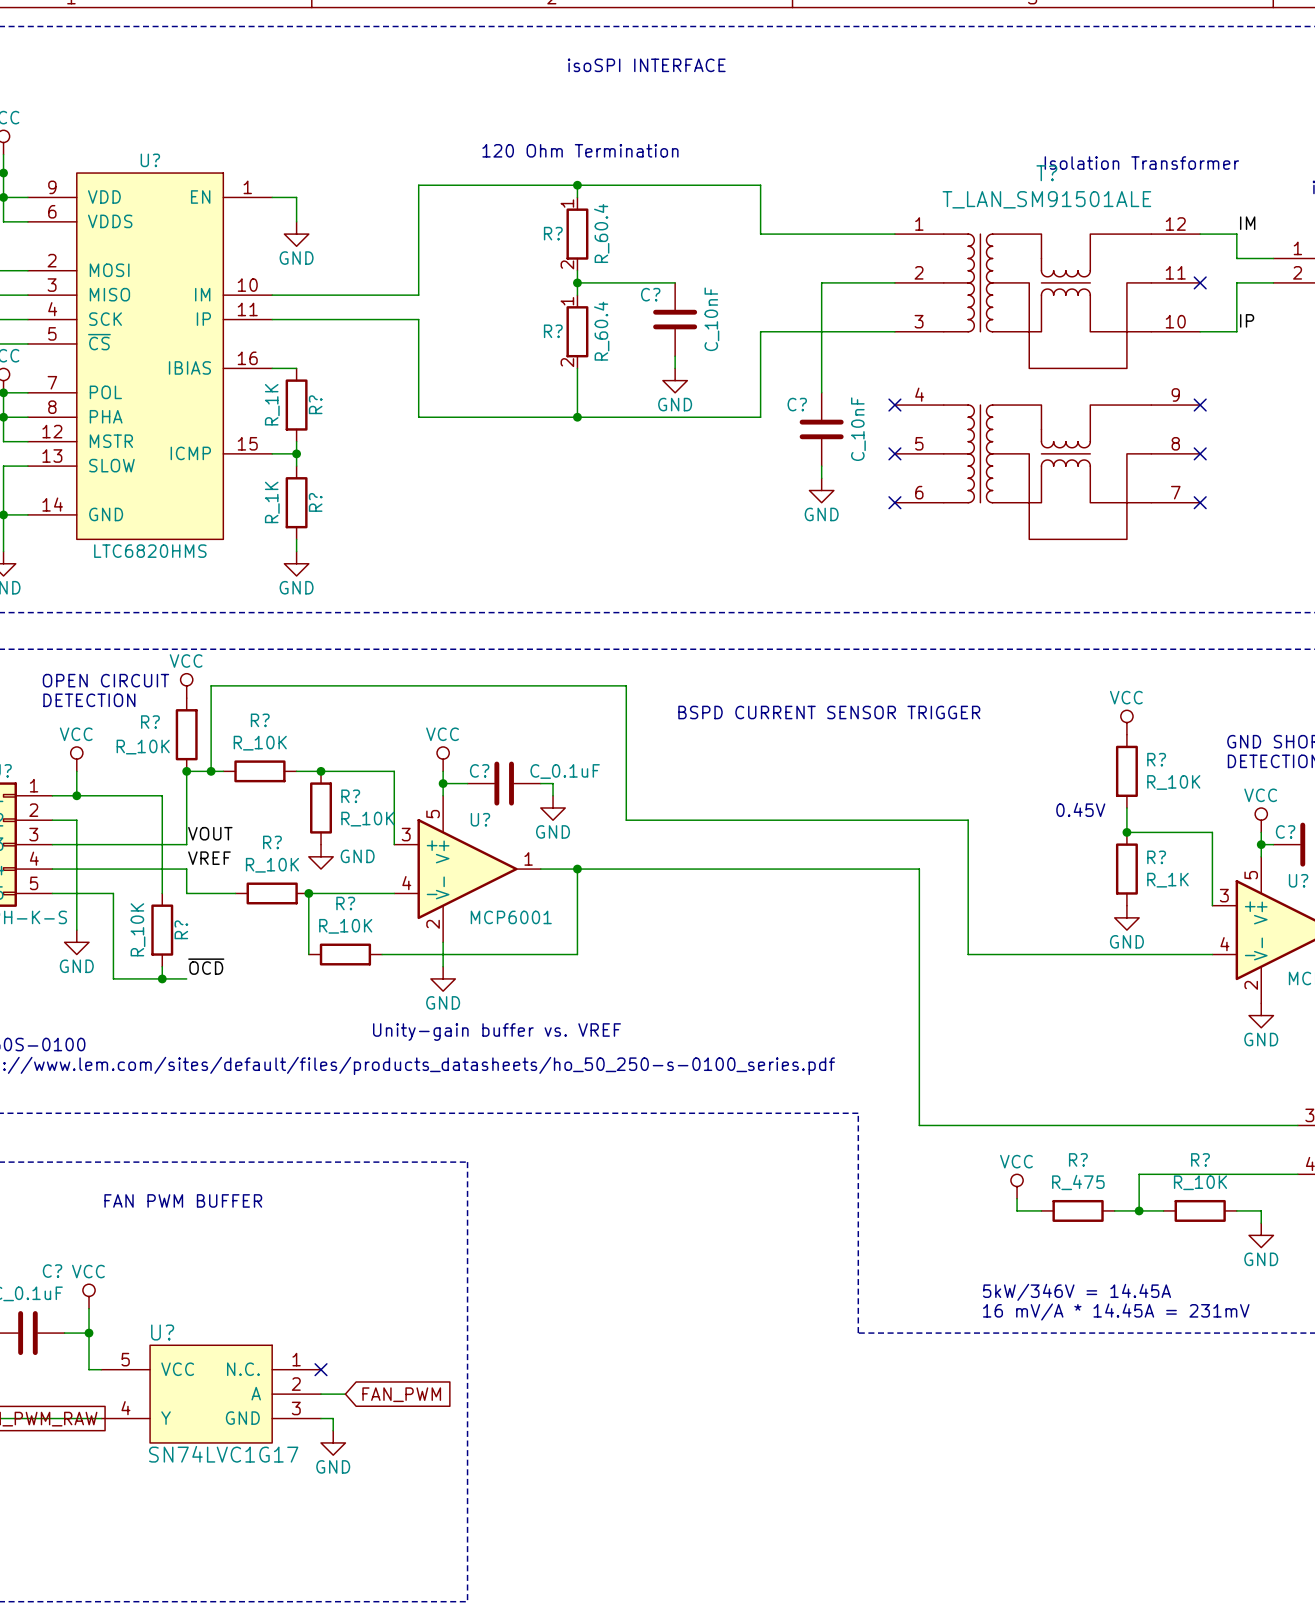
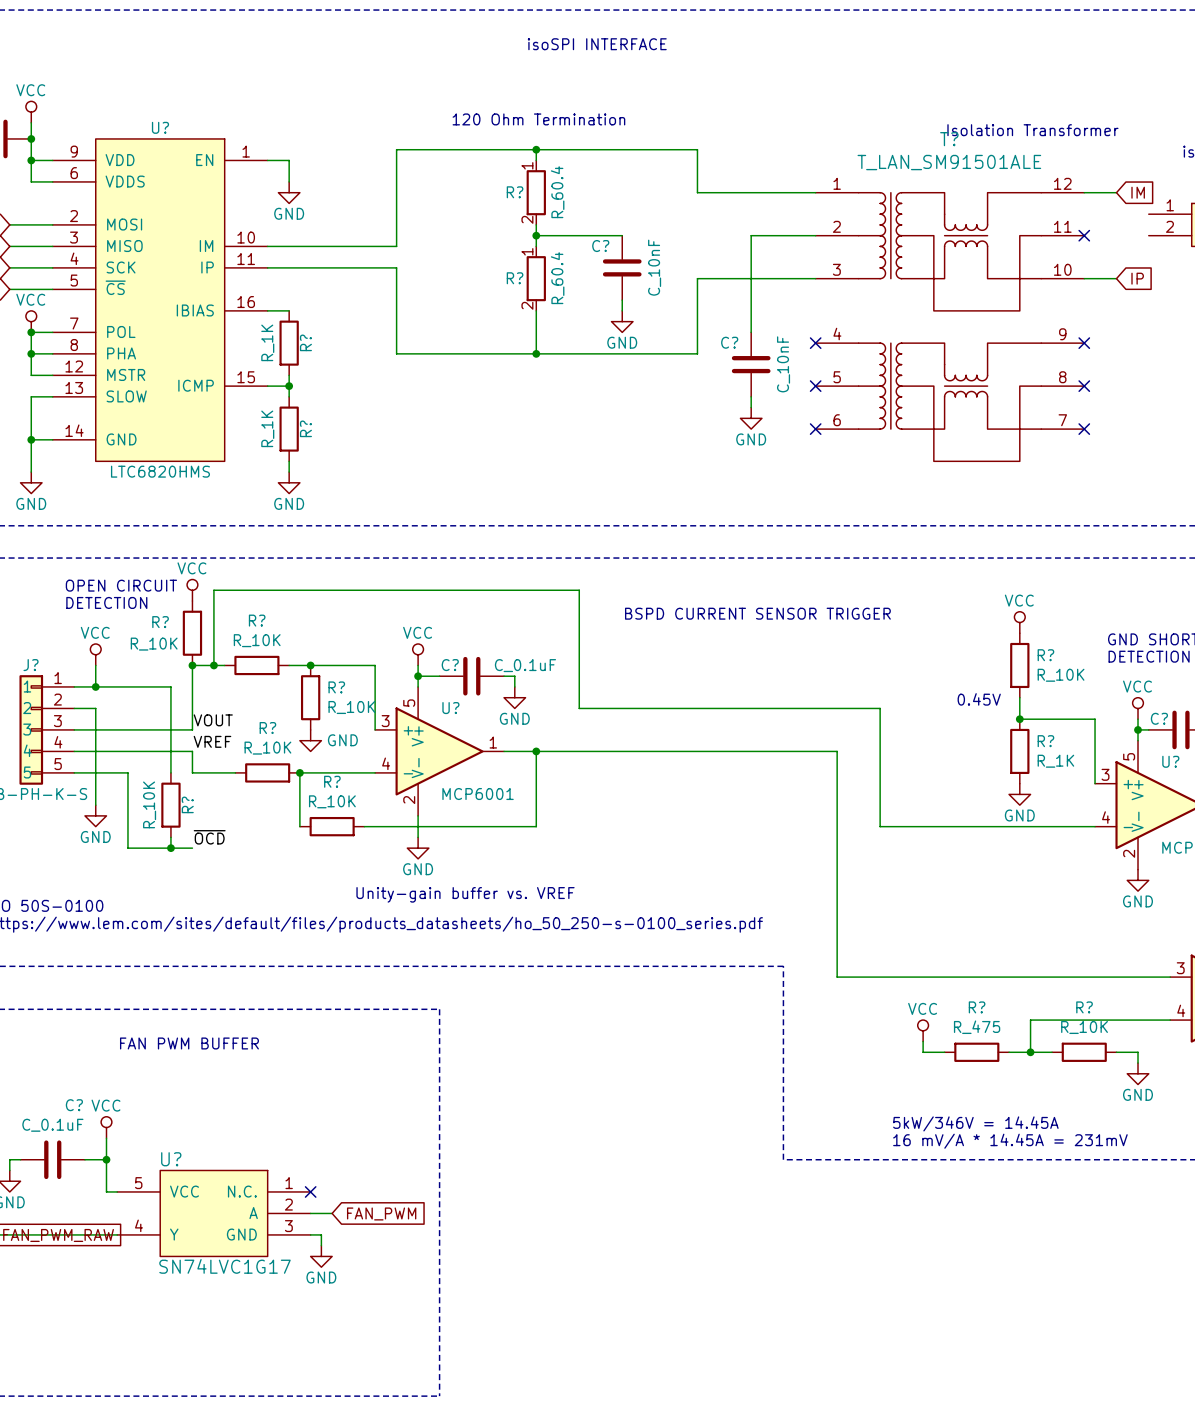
label: IM (1247, 223) -> none
wire: (1236, 234) (1236, 258) (1273, 258) -> none
global label: none -> IM (1138, 192)
wire: (1273, 282) (1236, 282) (1236, 331) -> none
label: IP (1247, 320) -> none
global label: none -> IP (1137, 278)

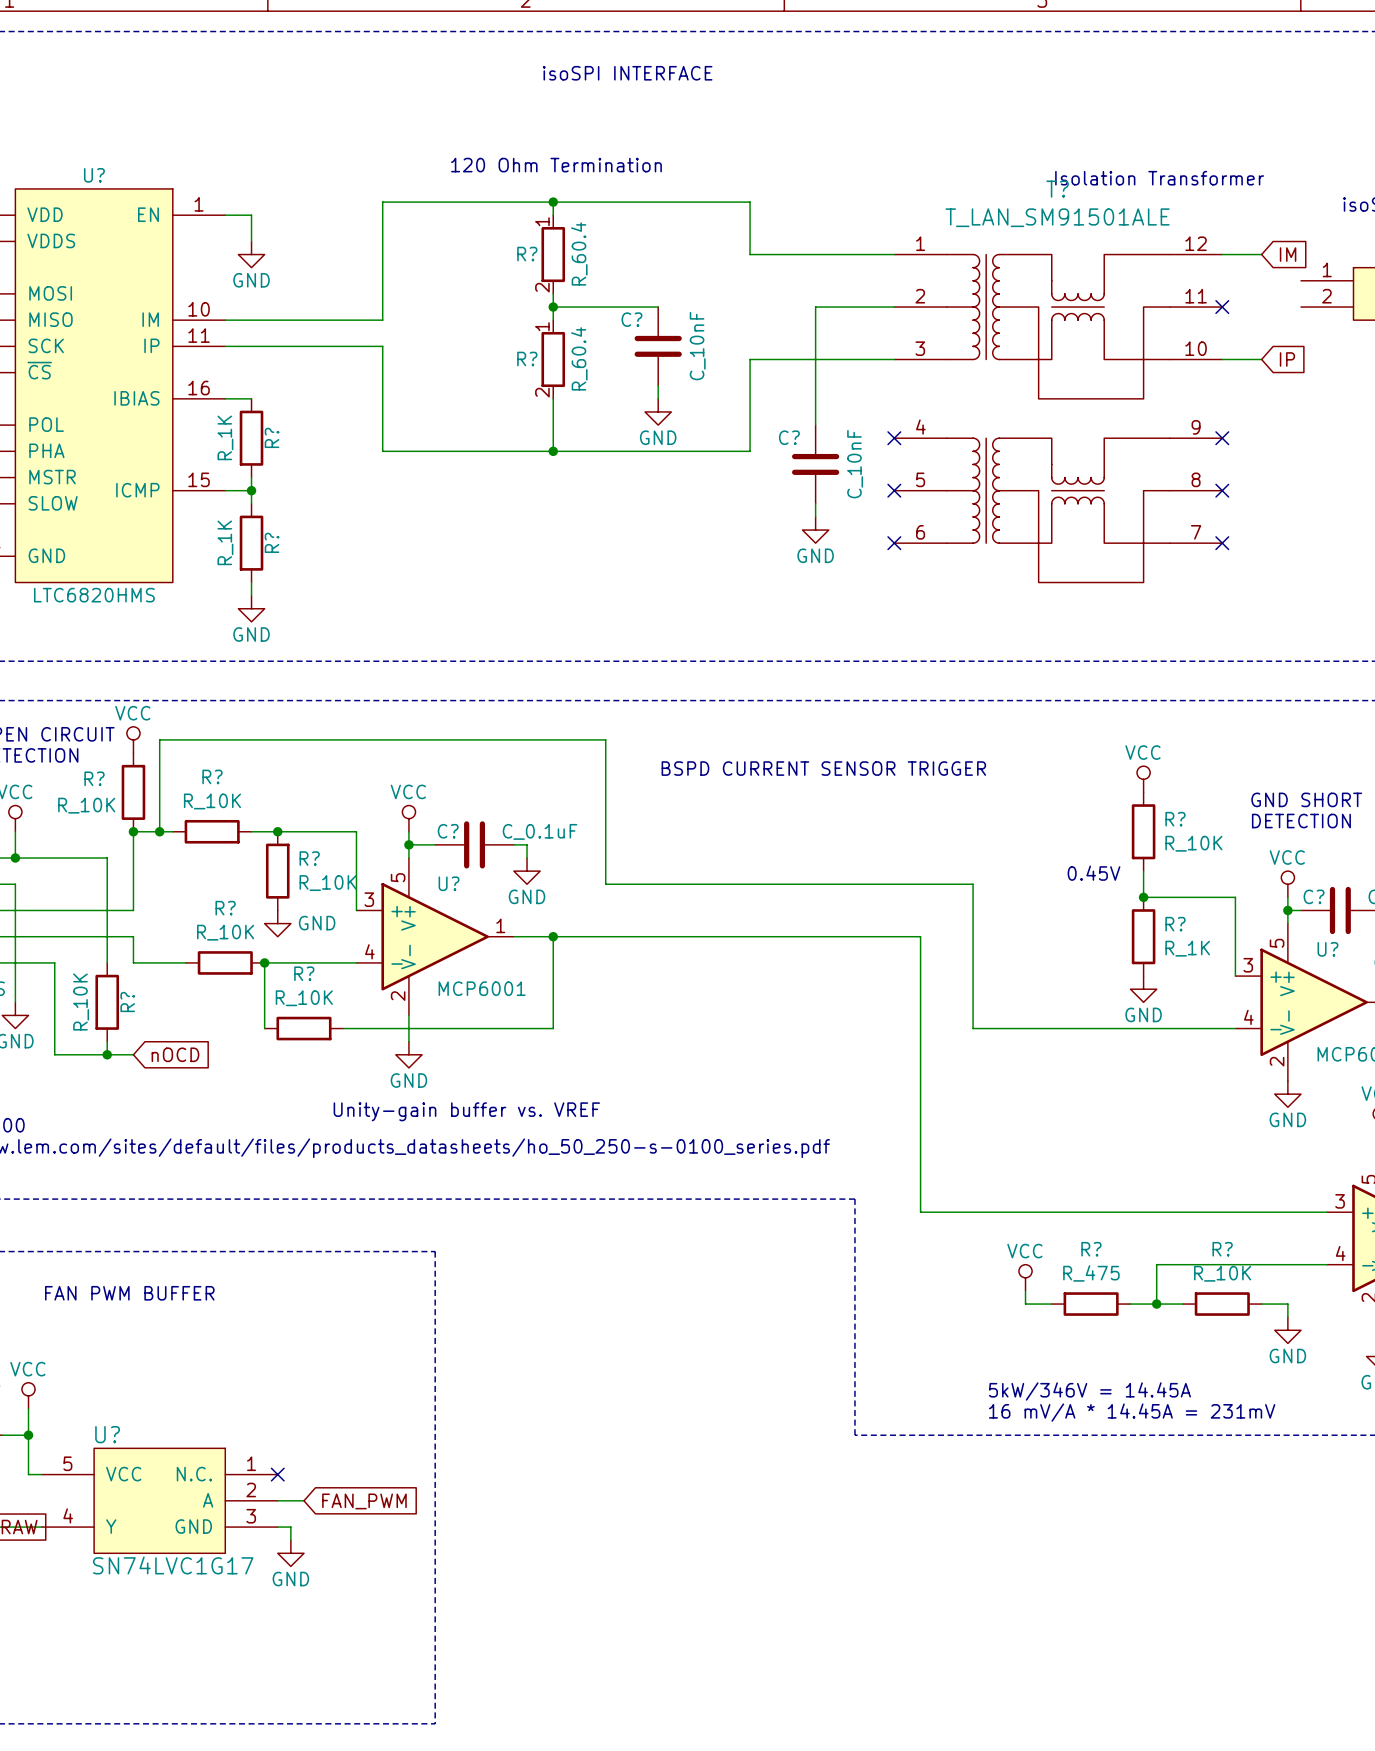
label: VOUT (213, 720) -> none
label: VREF (212, 741) -> none
label: ~{OCD} (209, 837) -> none
global label: none -> nOCD (175, 1054)

